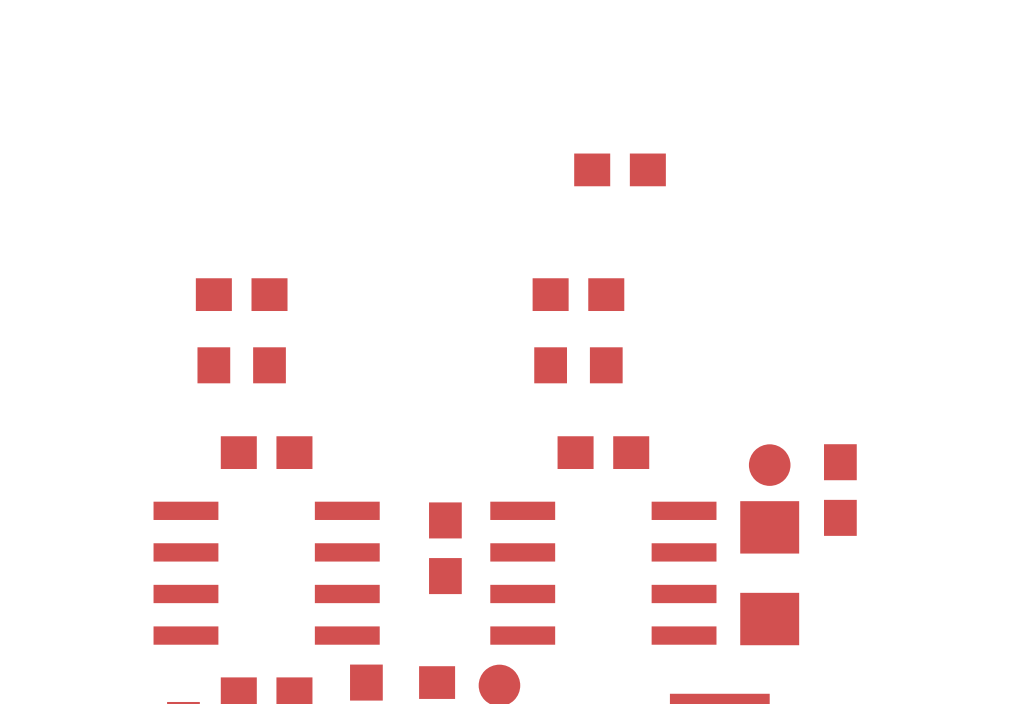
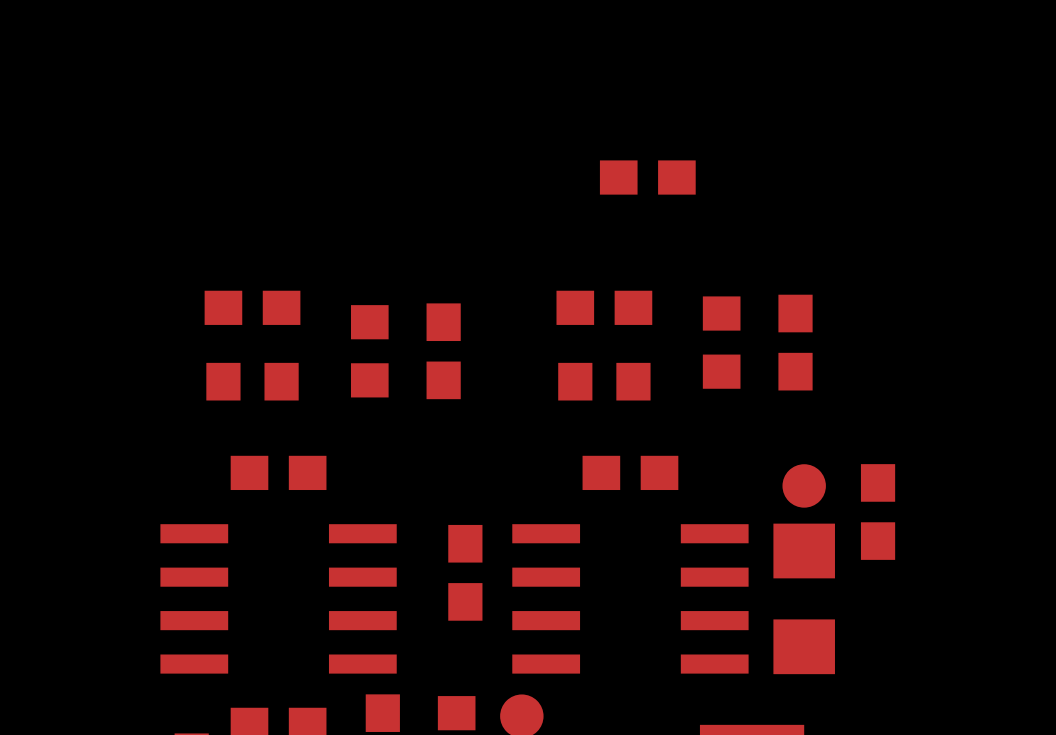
part: none -> (721, 342)
part: none -> (795, 342)
part: none -> (369, 351)
part: none -> (443, 351)

